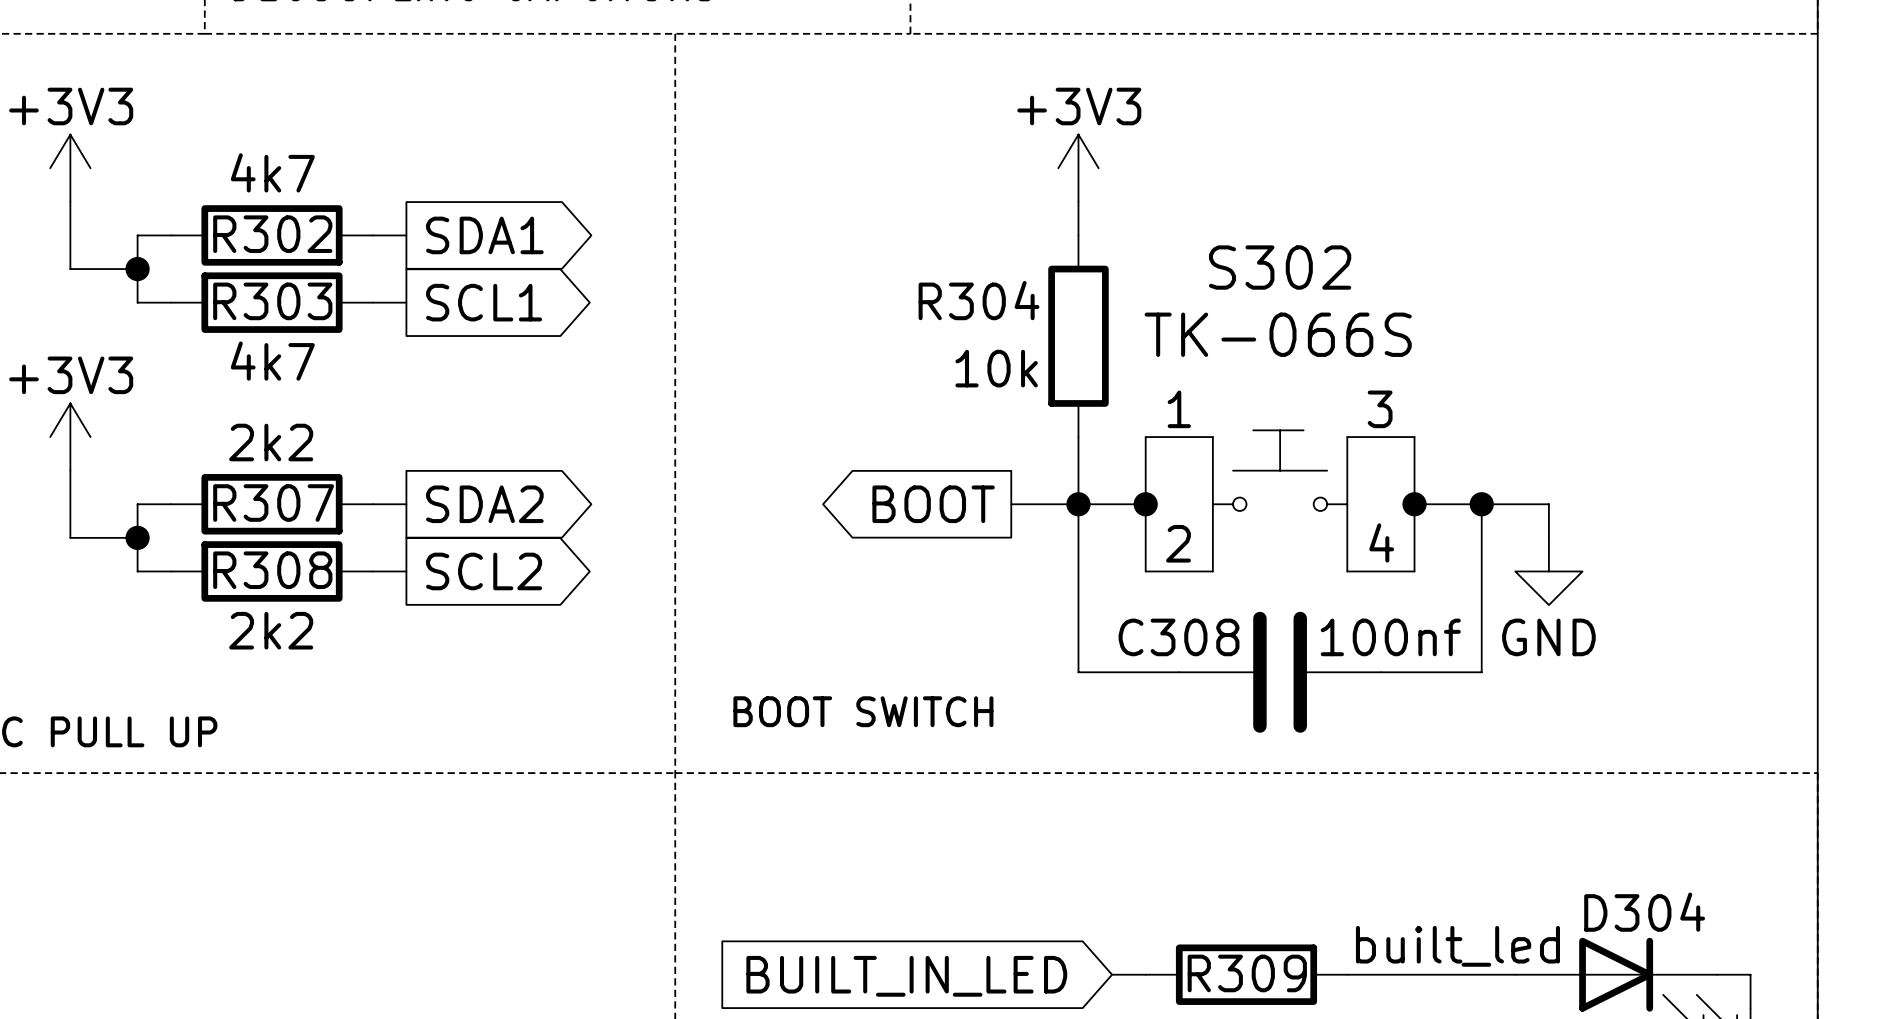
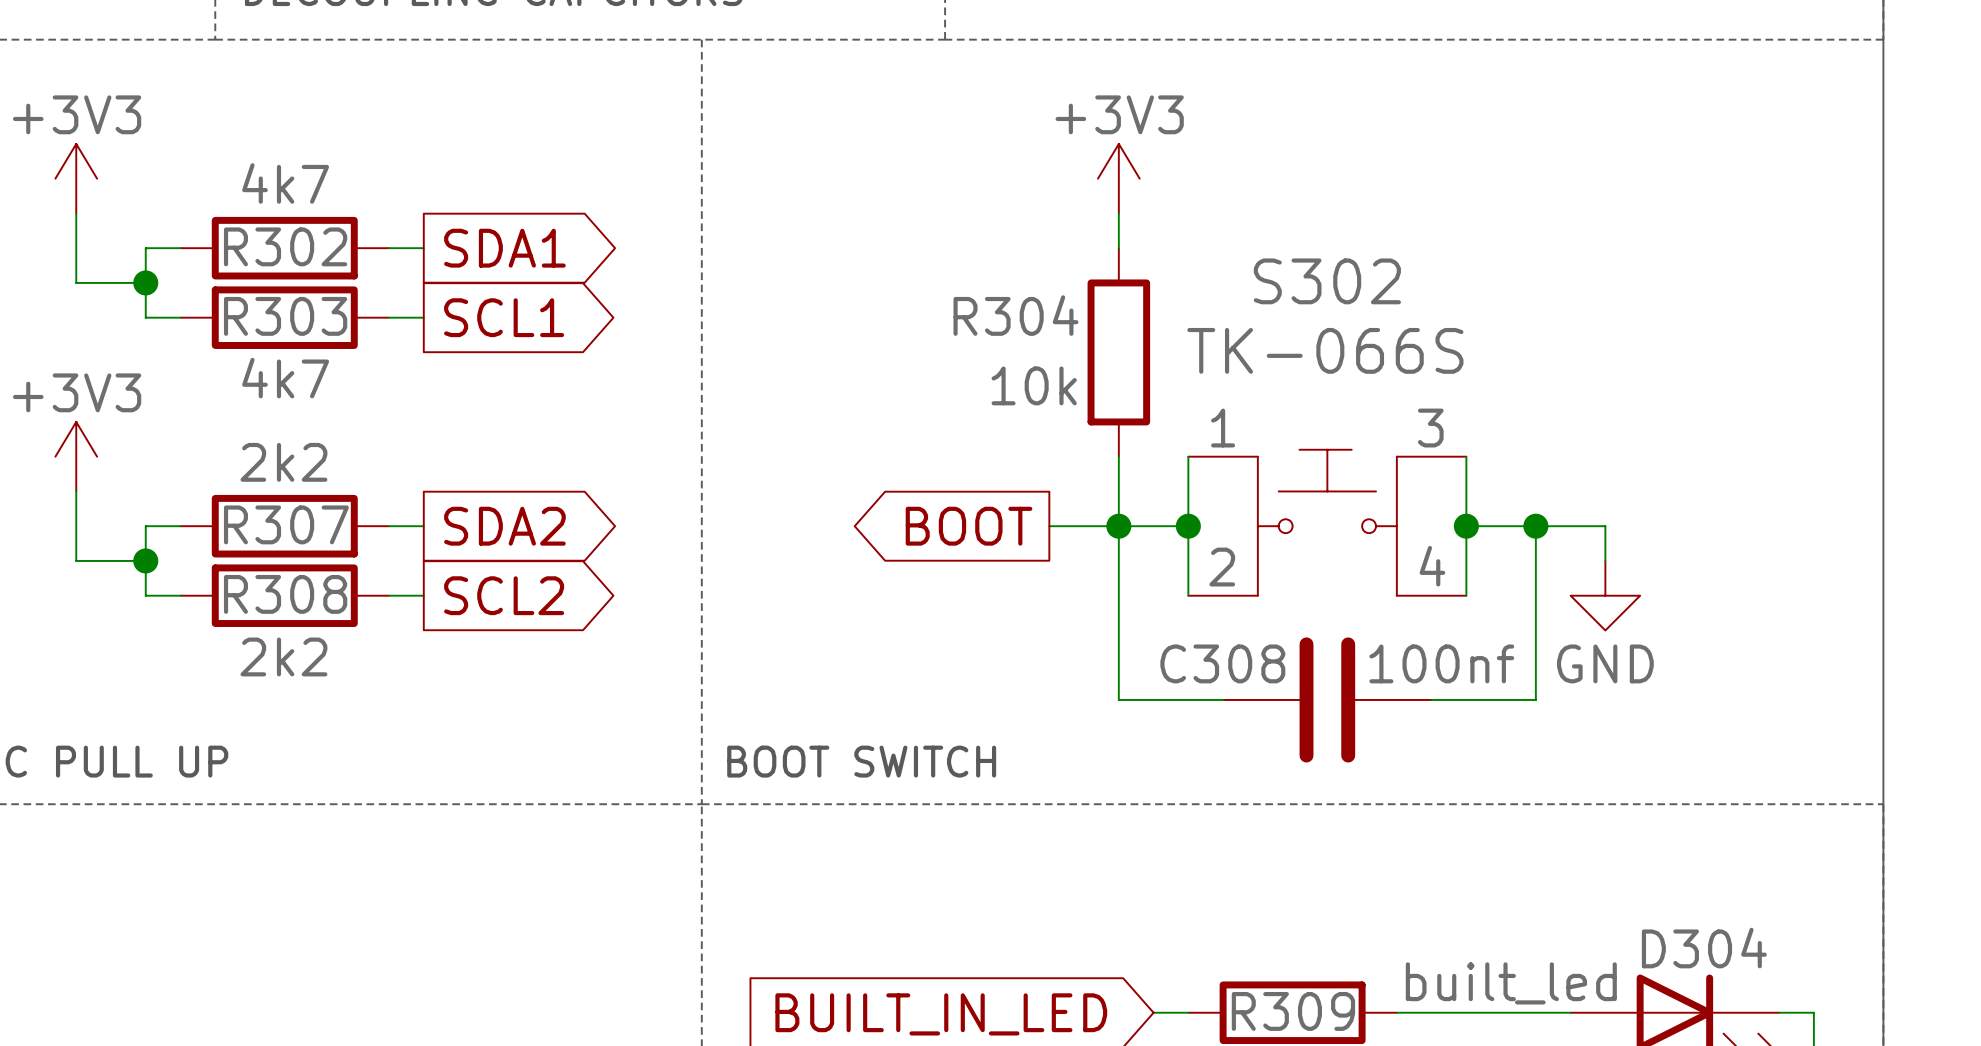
text position: BOOT SWITCH (863, 711) -> BOOT SWITCH (861, 761)

